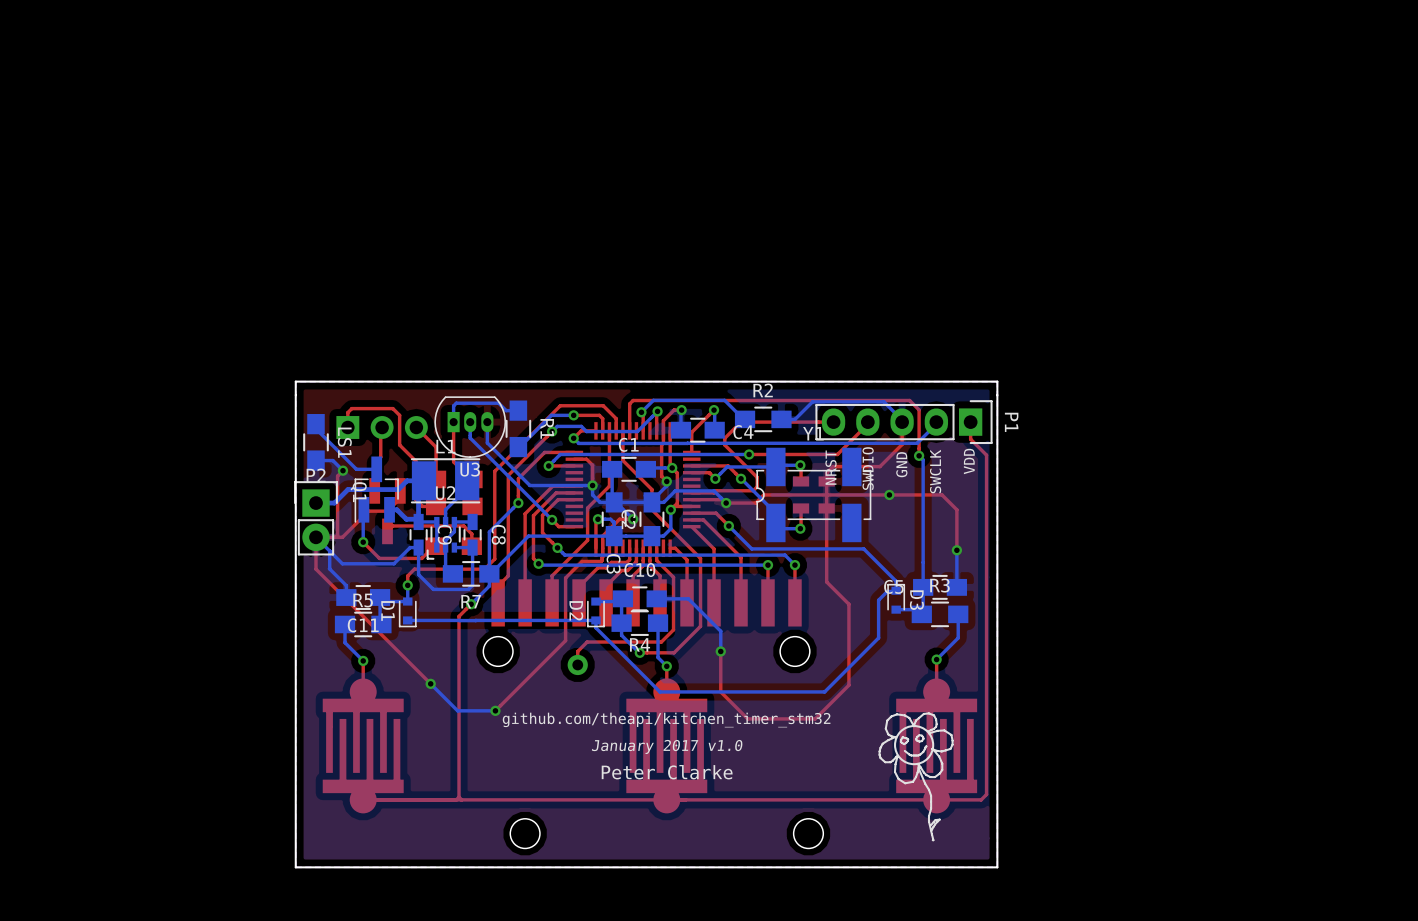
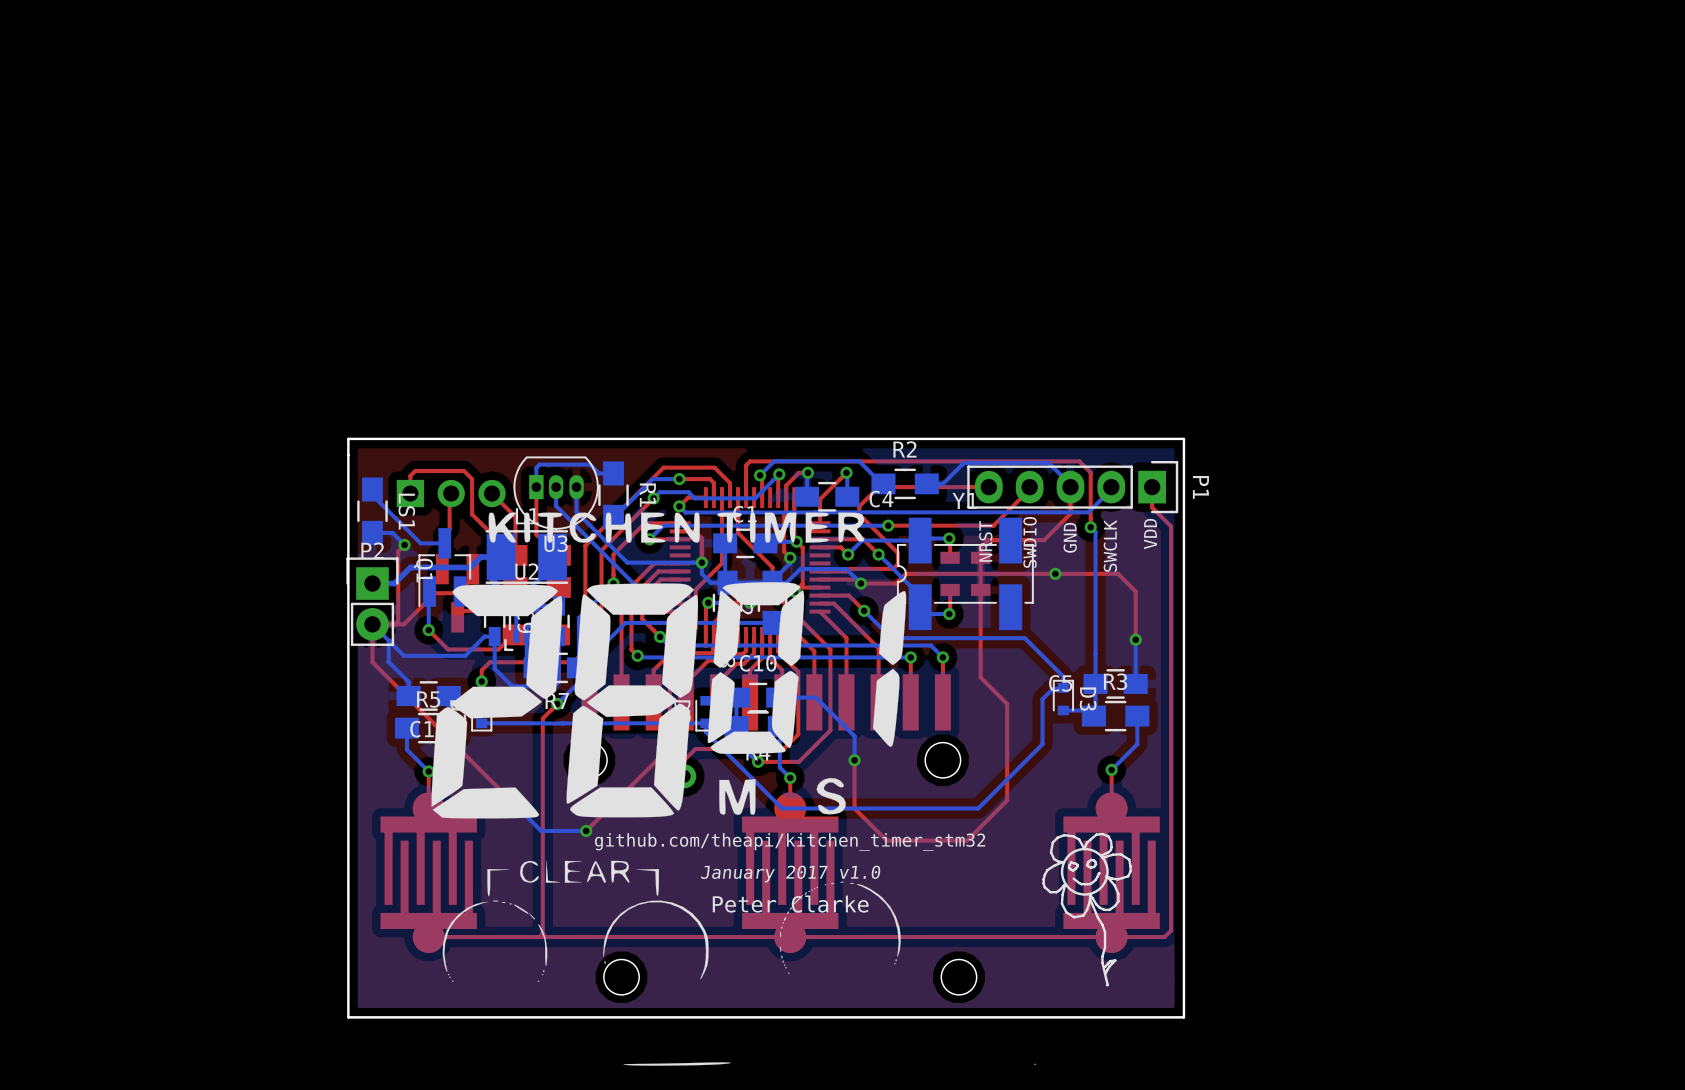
drawing: none -> [431, 512, 1036, 1066]

